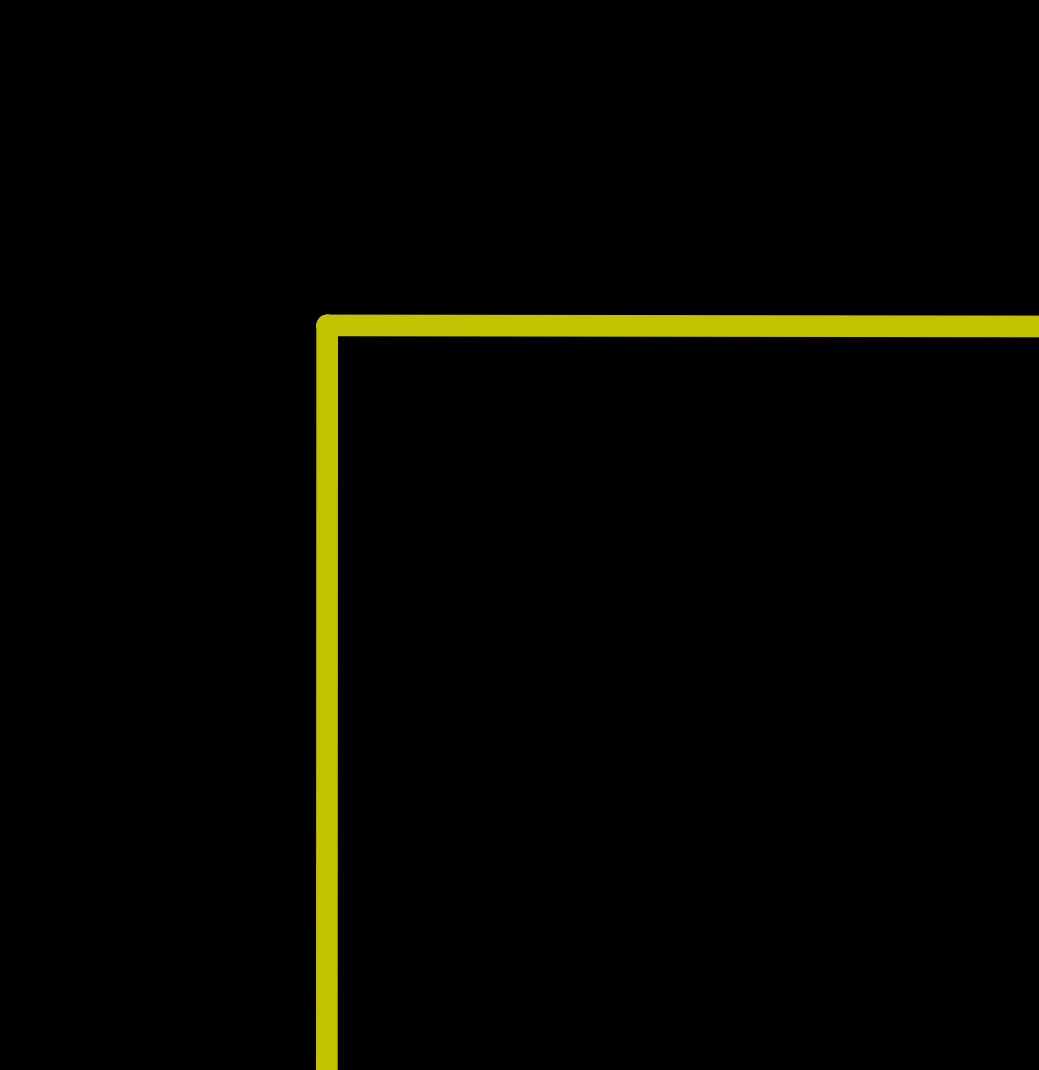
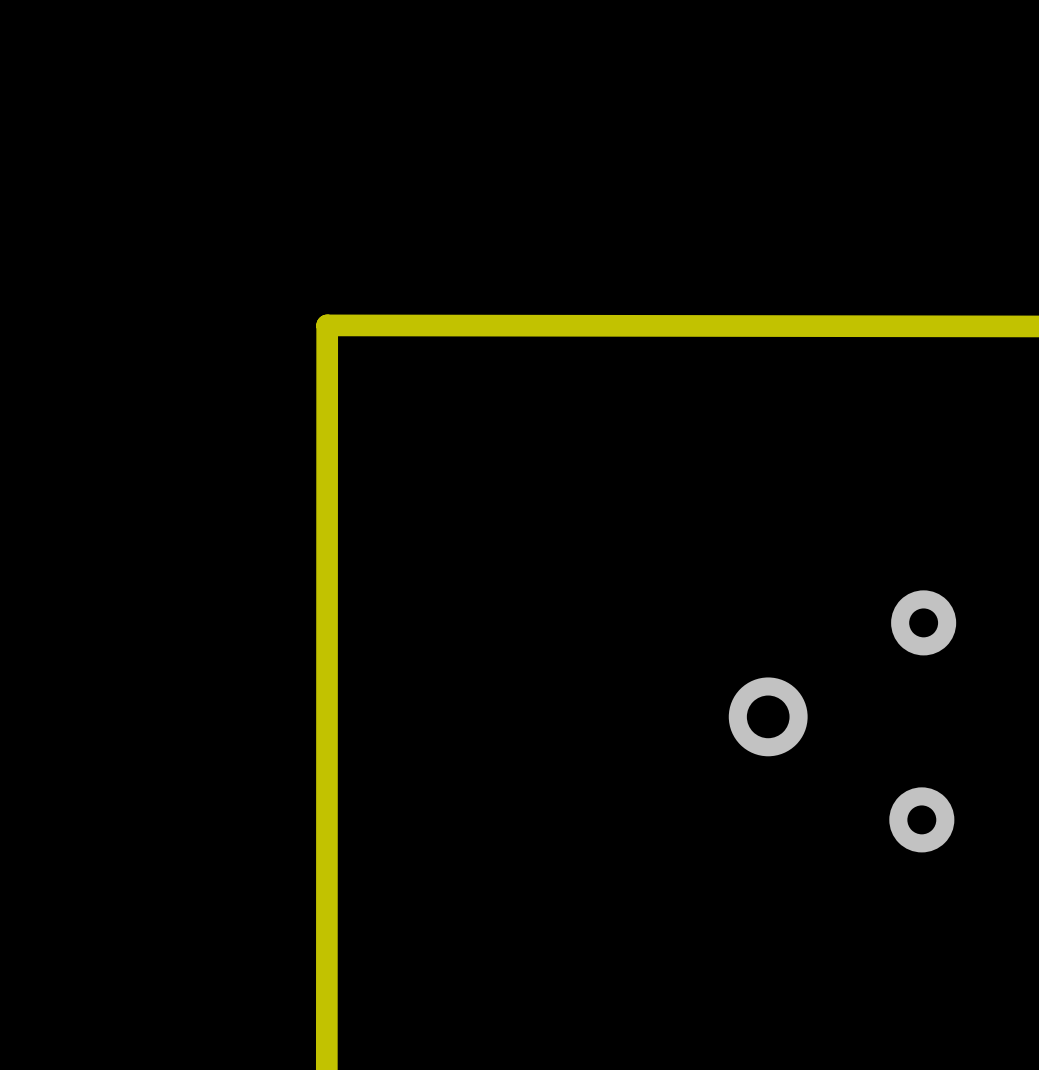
via: none -> (923, 622)
via: none -> (768, 716)
via: none -> (921, 819)

